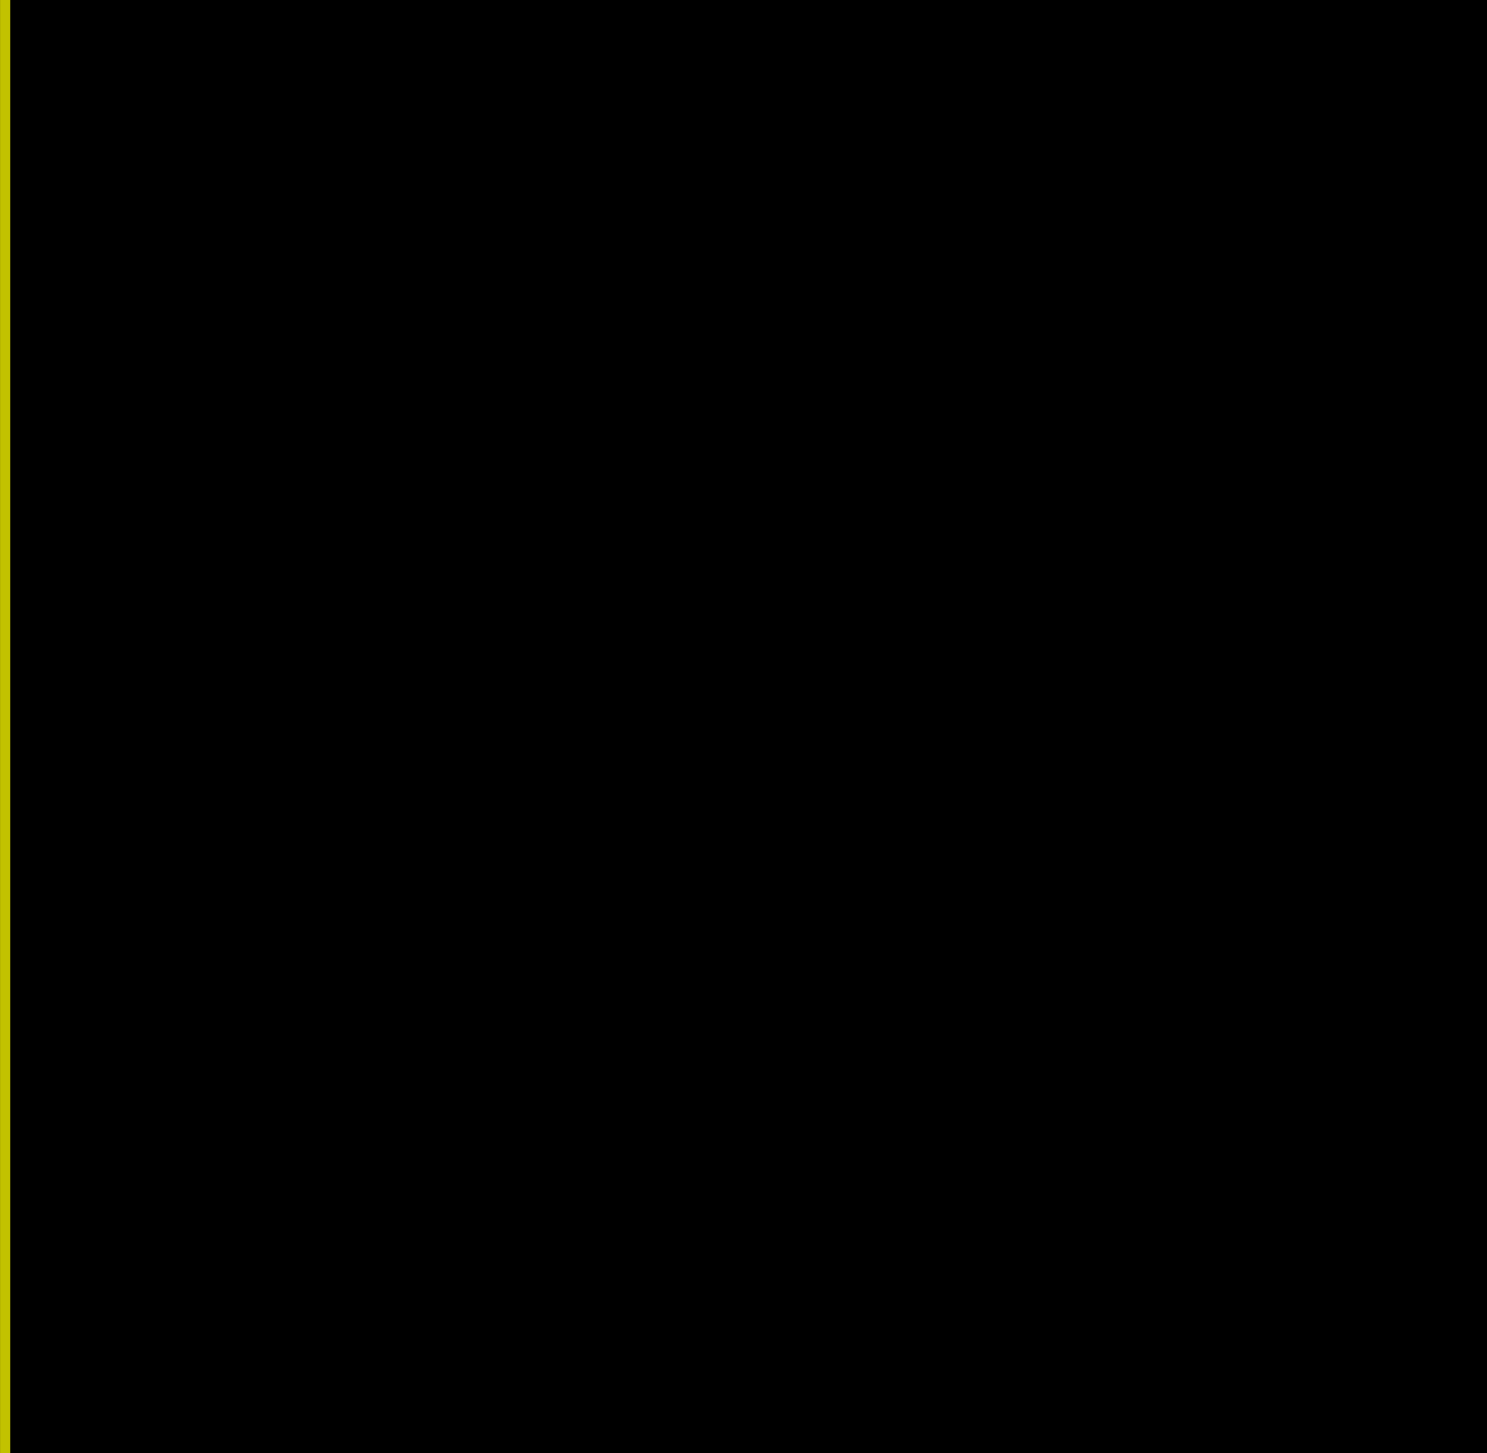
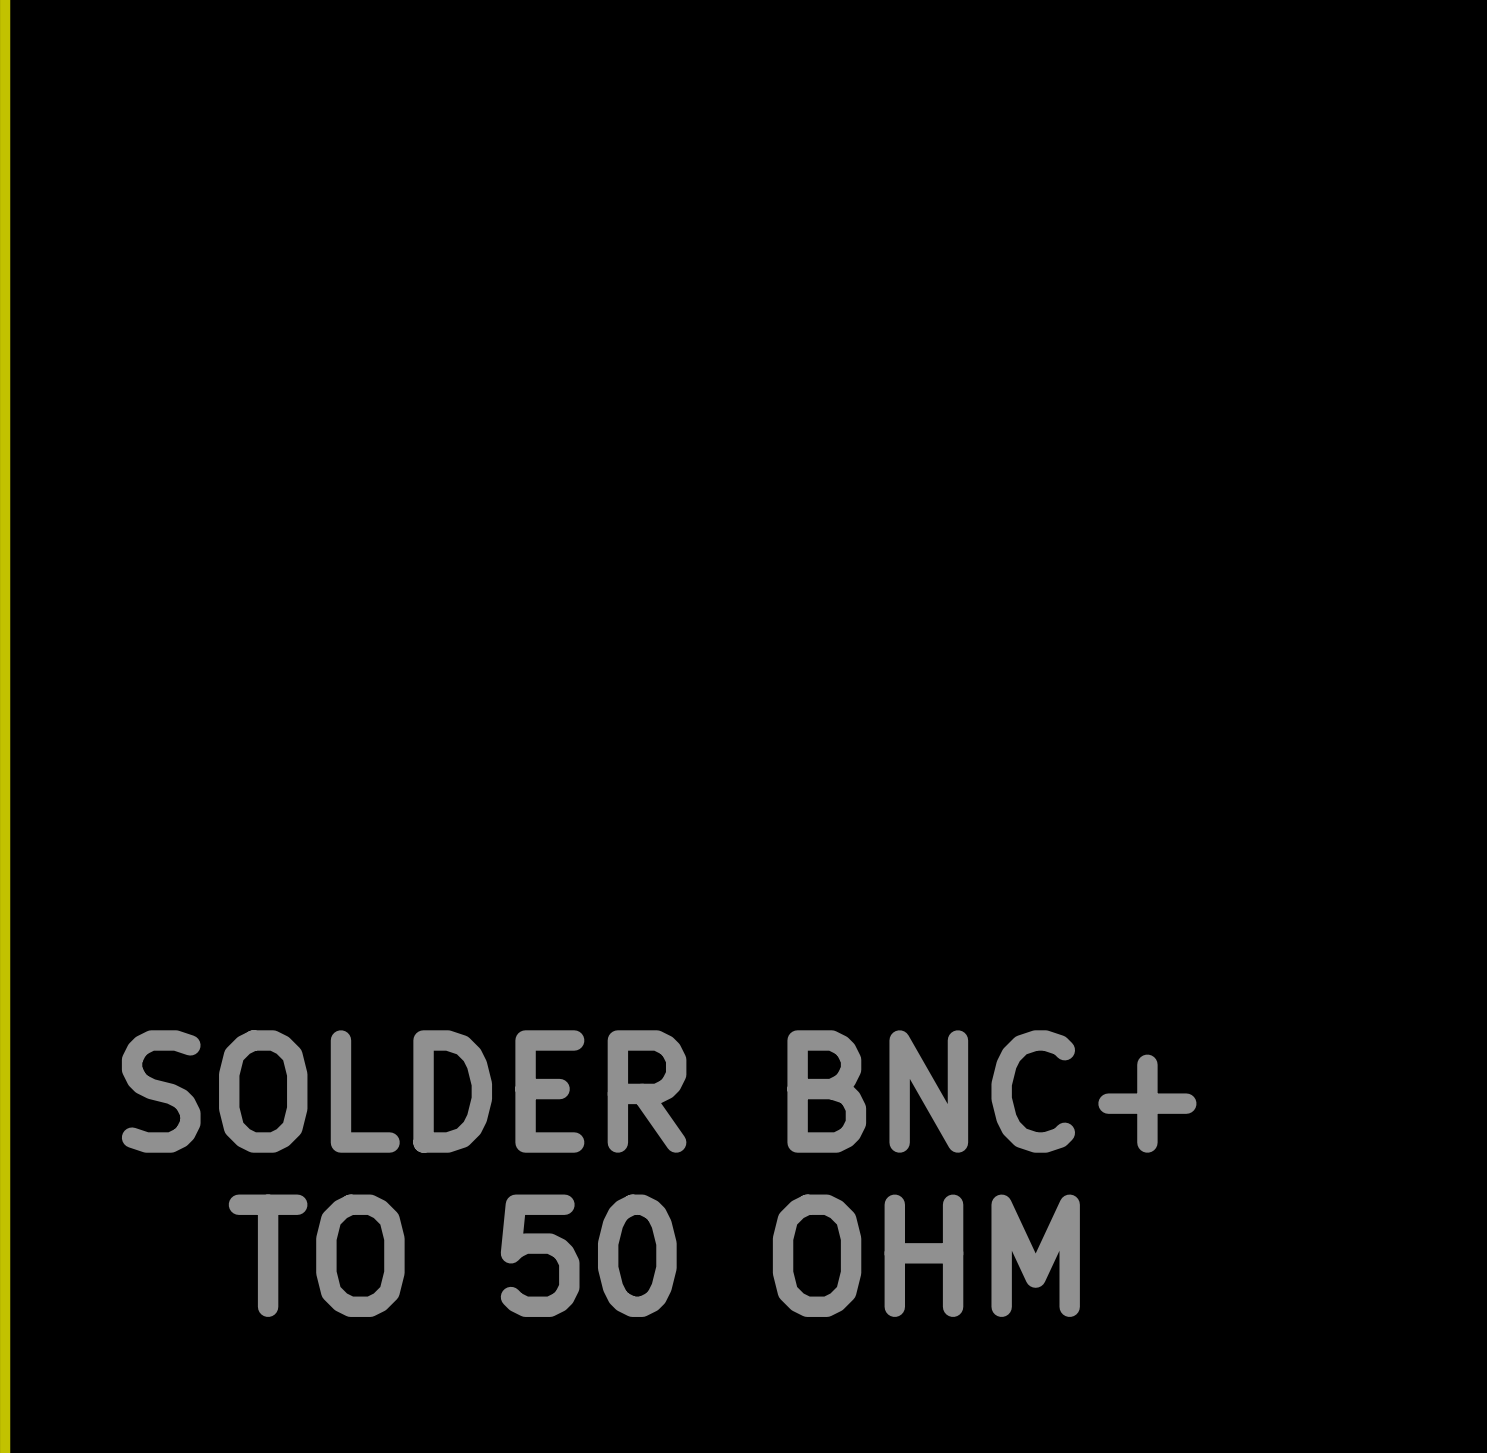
text: none -> SOLDER BNC+ (659, 1091)
text: none -> TO 50 OHM (654, 1255)

